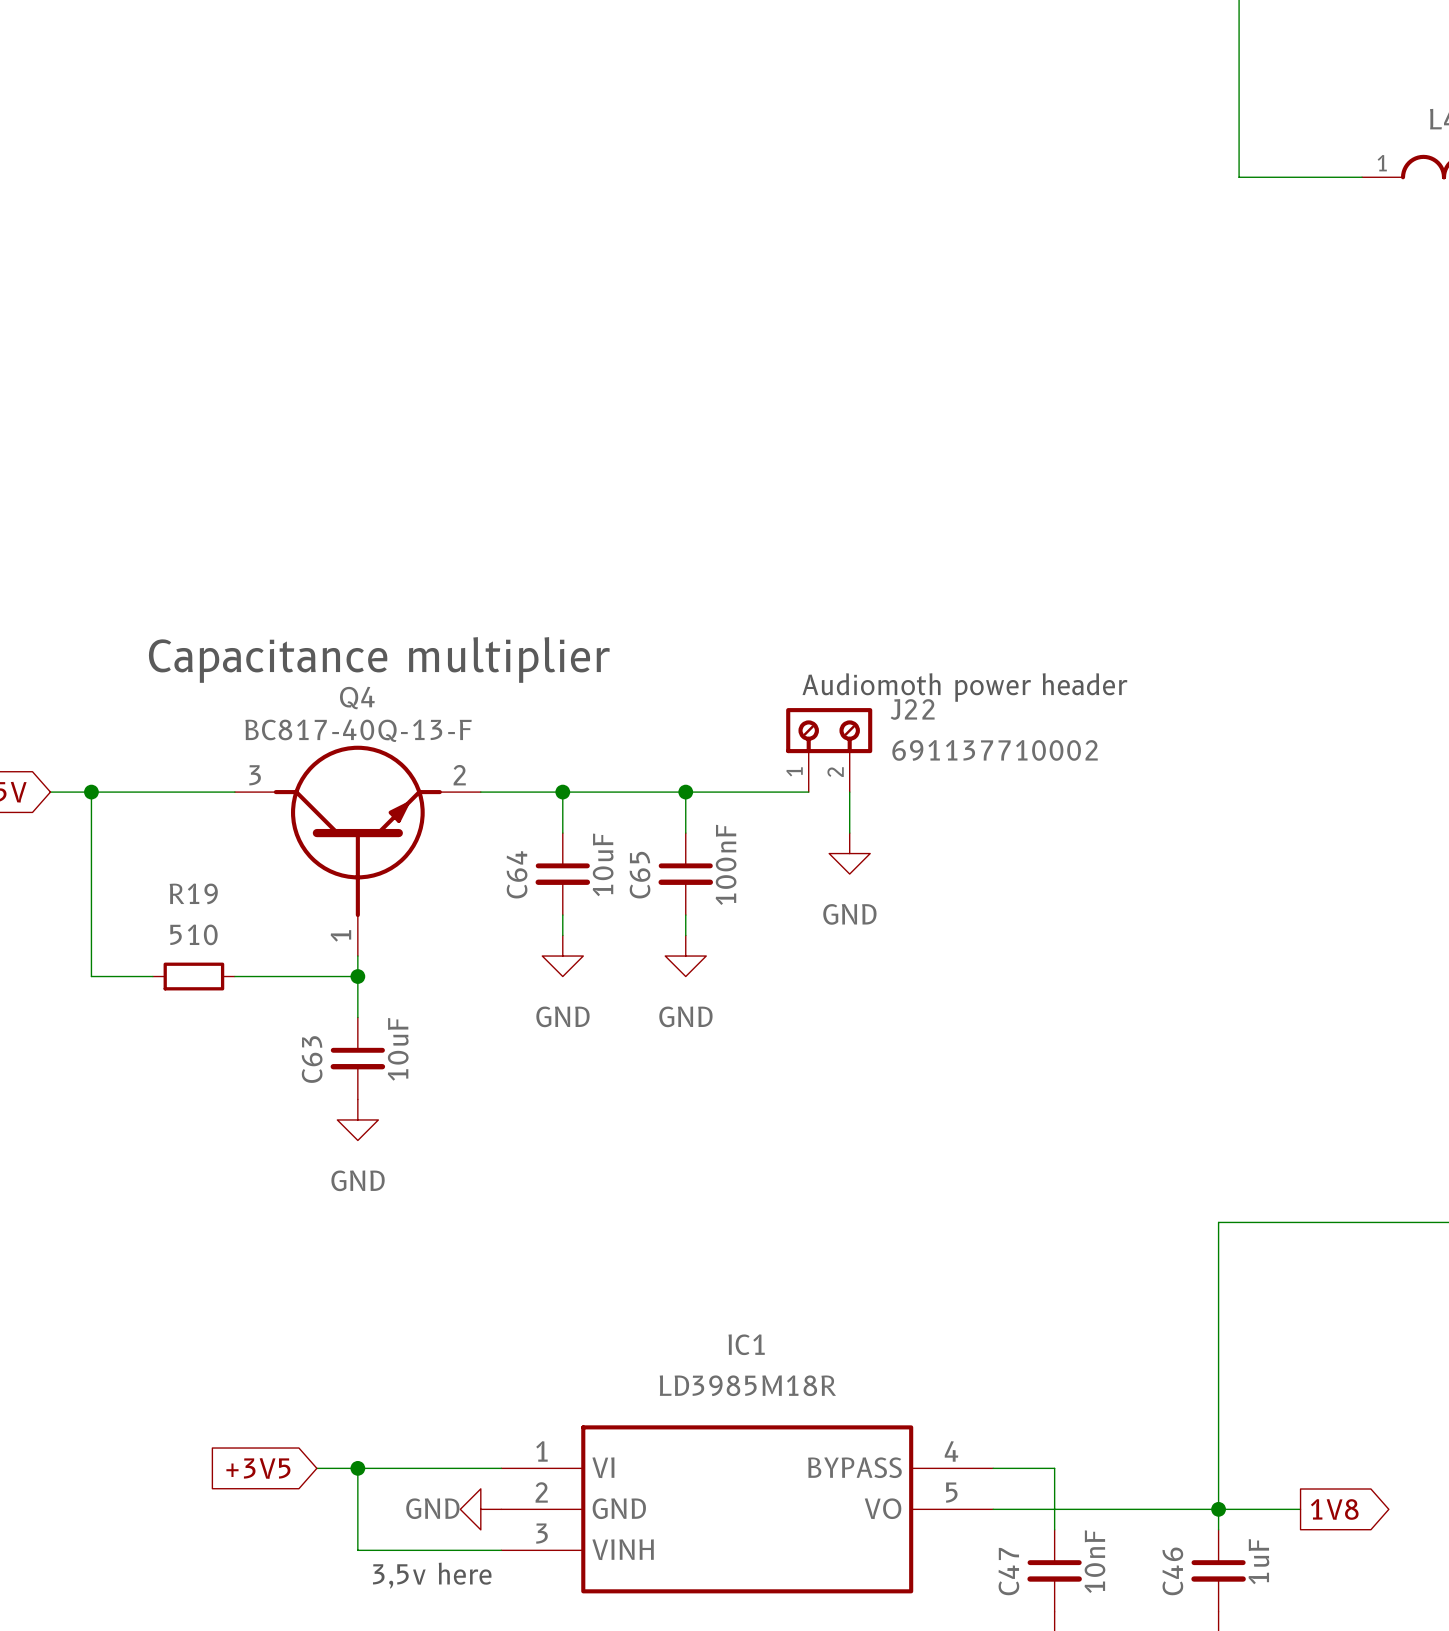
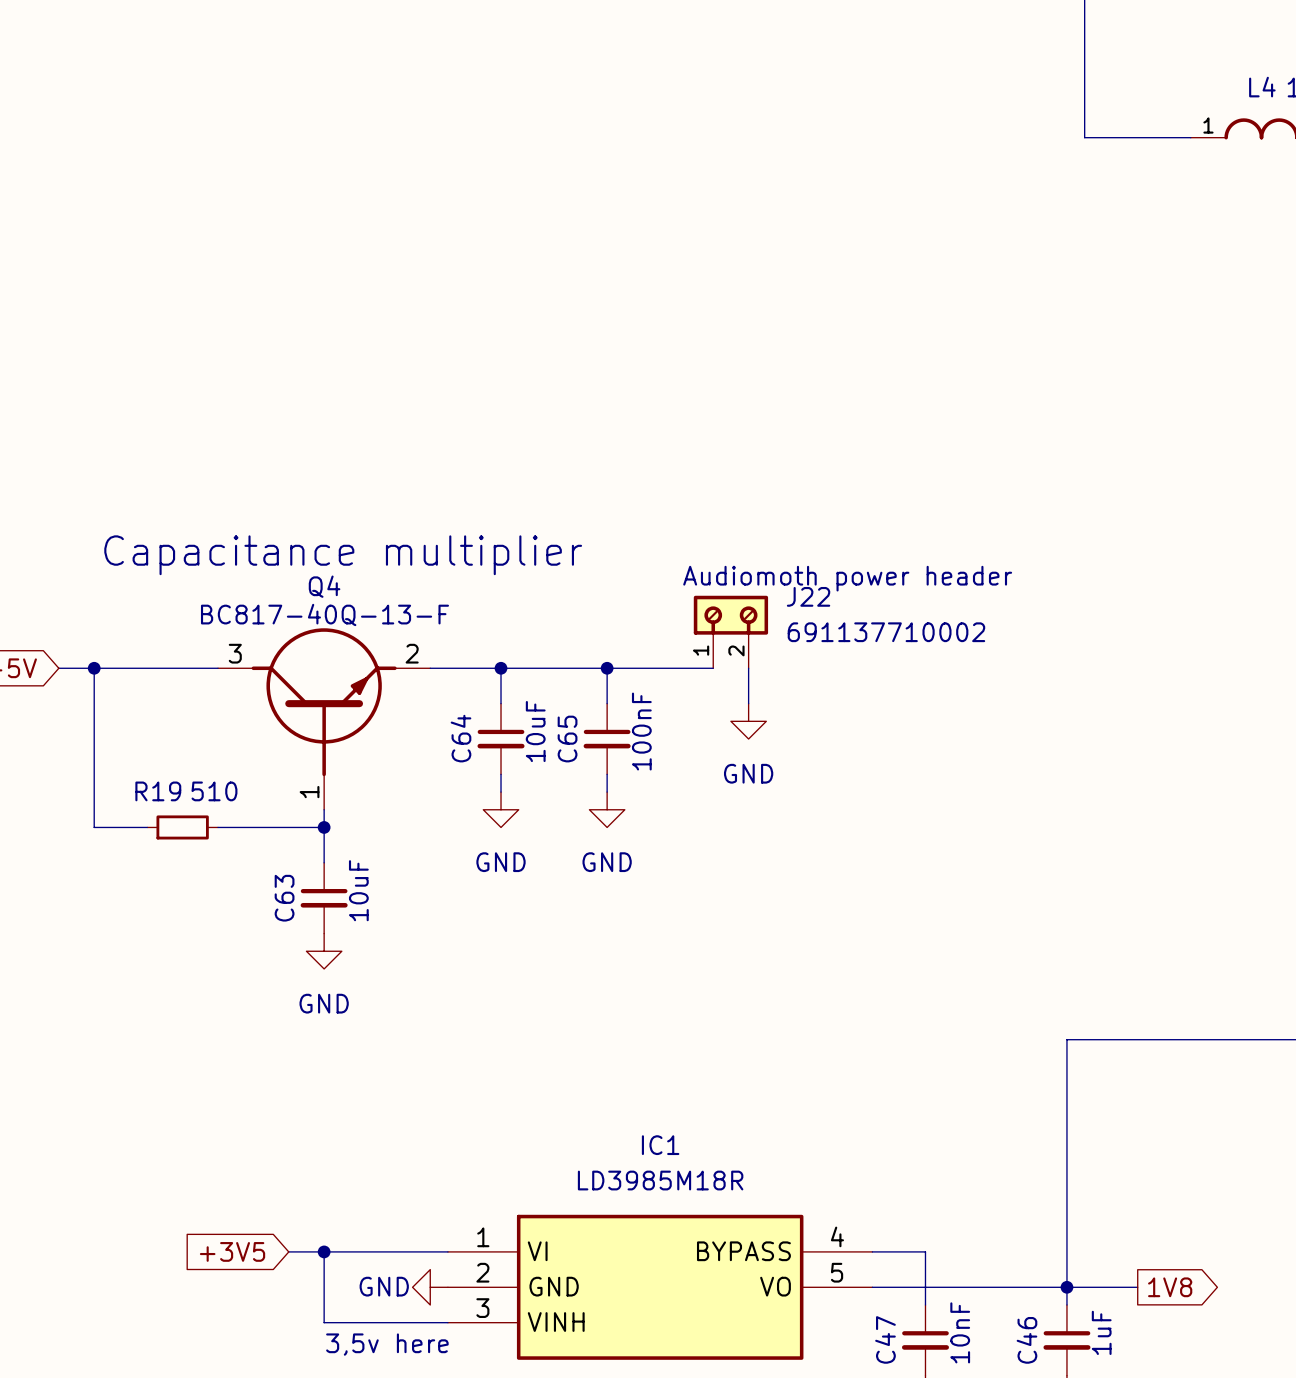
R19 name position: R19 (193, 893) -> R19 (158, 791)
R19 value position: 510 (193, 934) -> 510 (214, 791)

